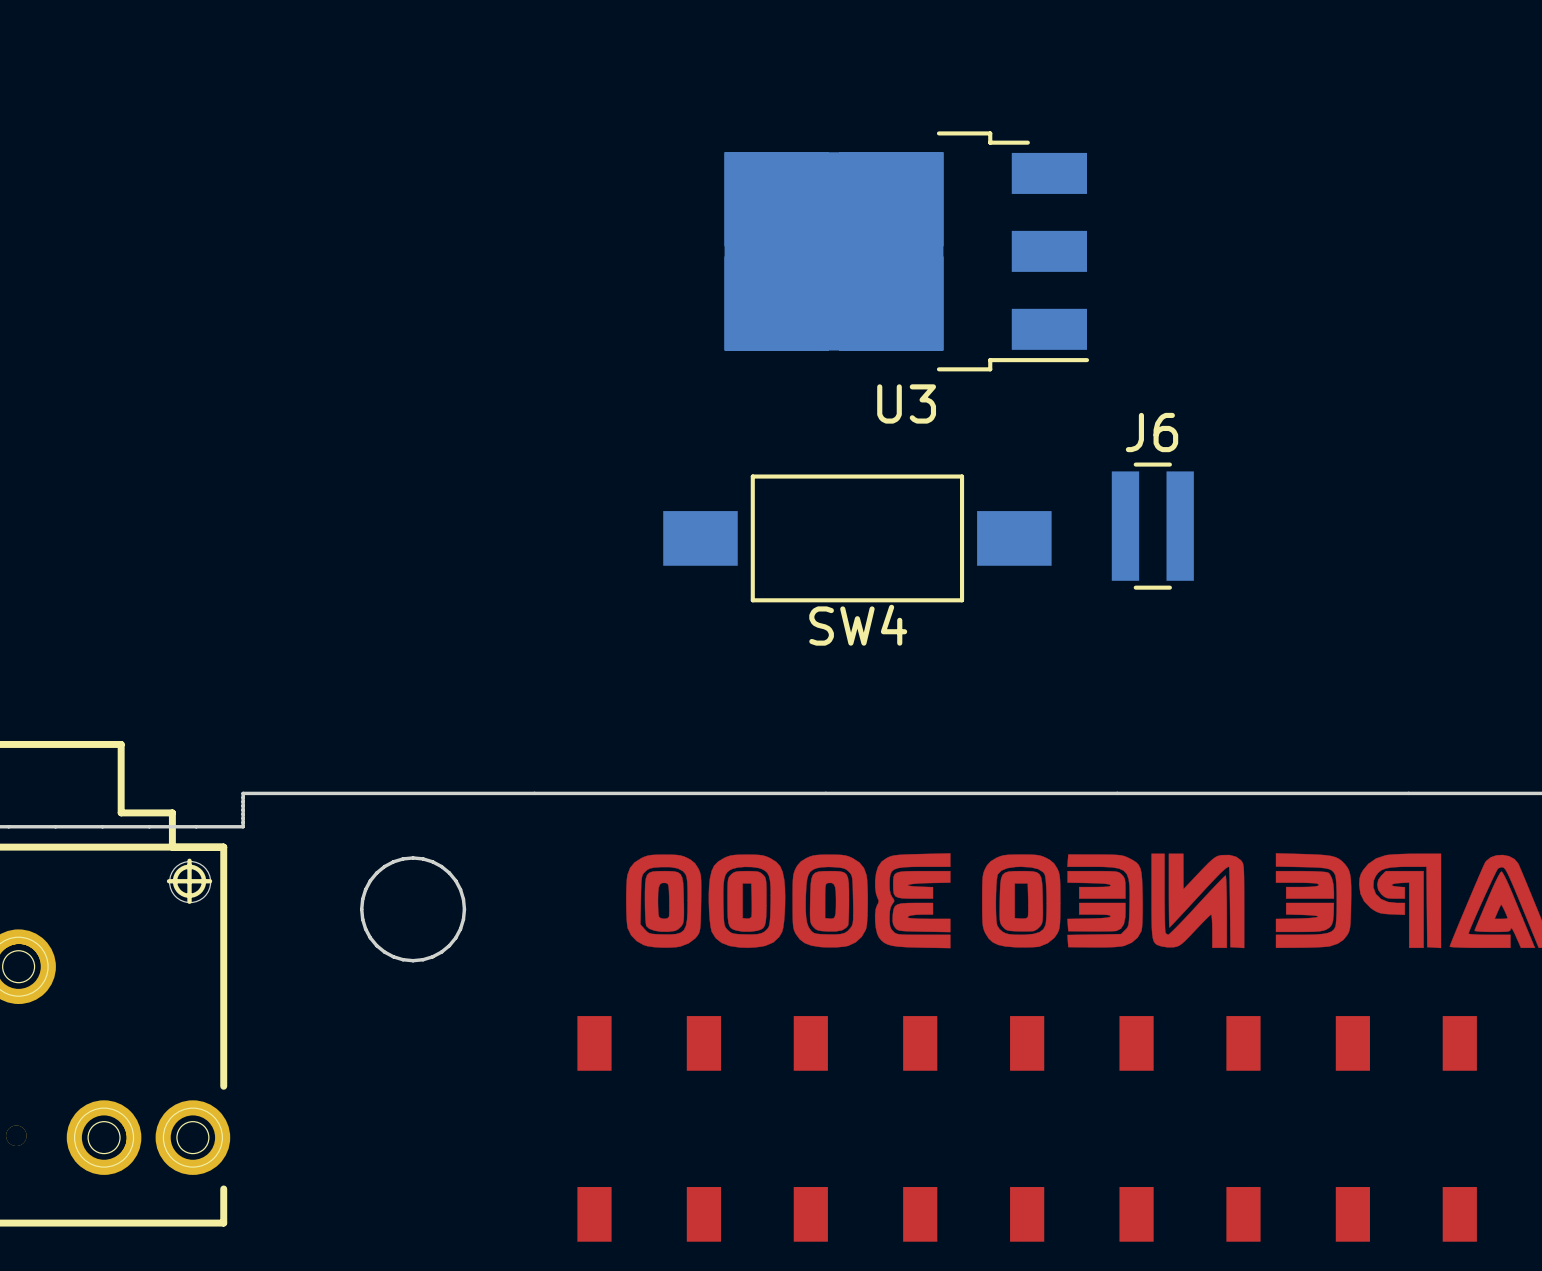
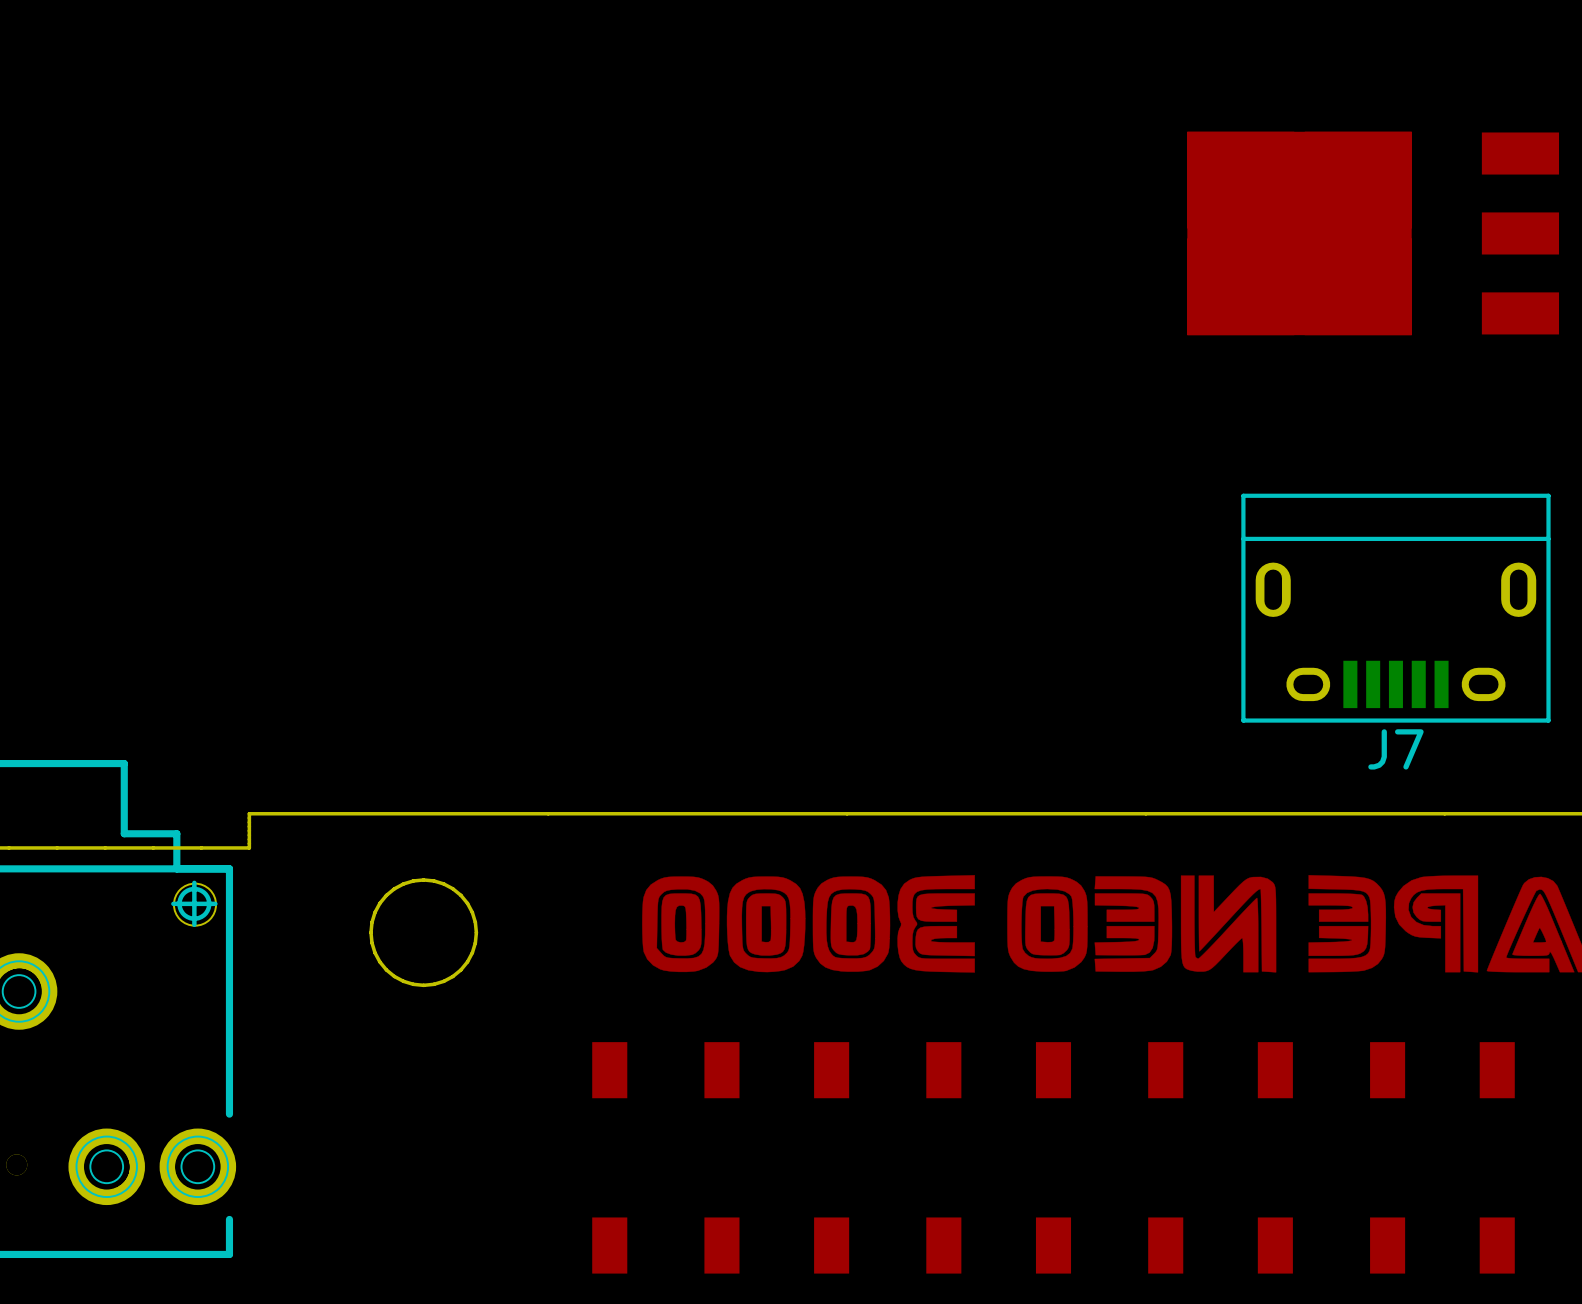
U3 side: bottom (906, 251) -> top (1373, 233)
J6: (1152, 526) -> none
SW4: (857, 538) -> none
J7: none -> (1395, 608)

